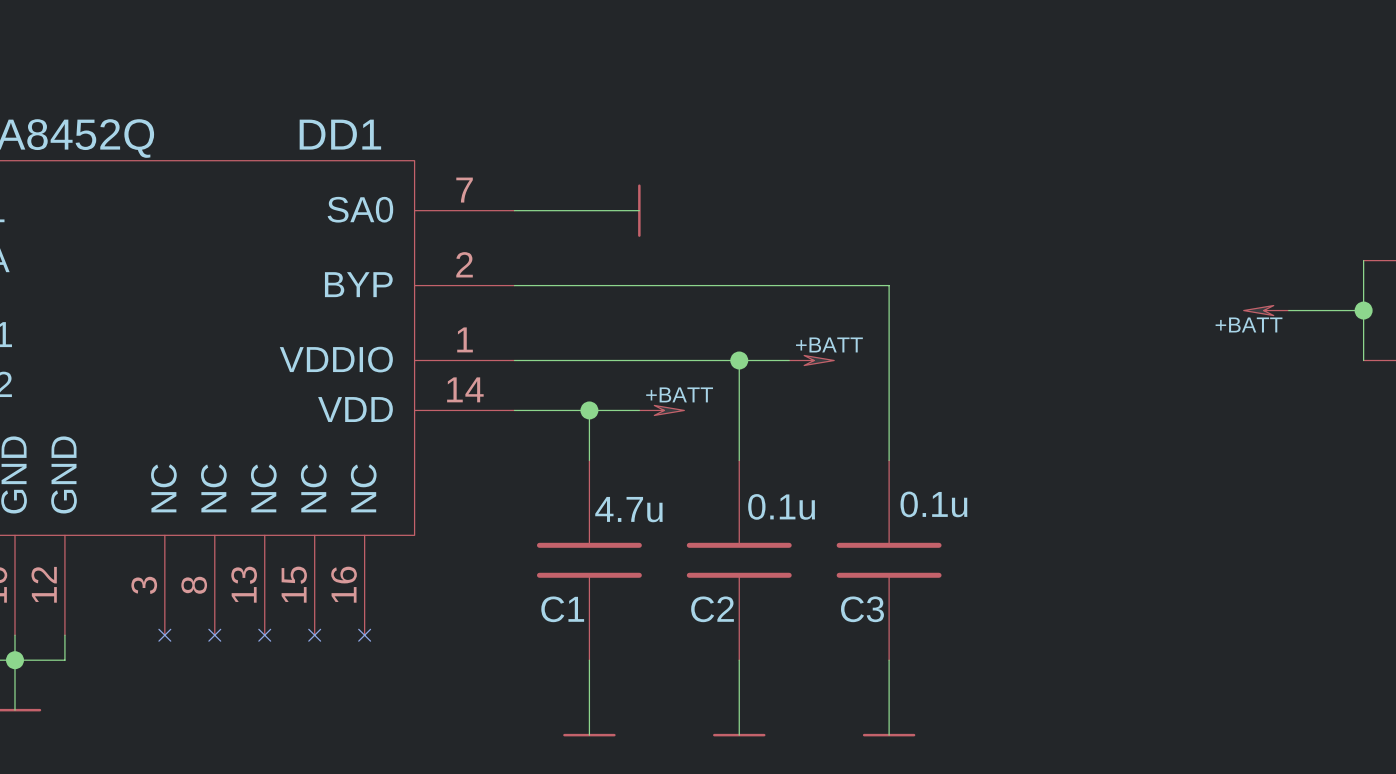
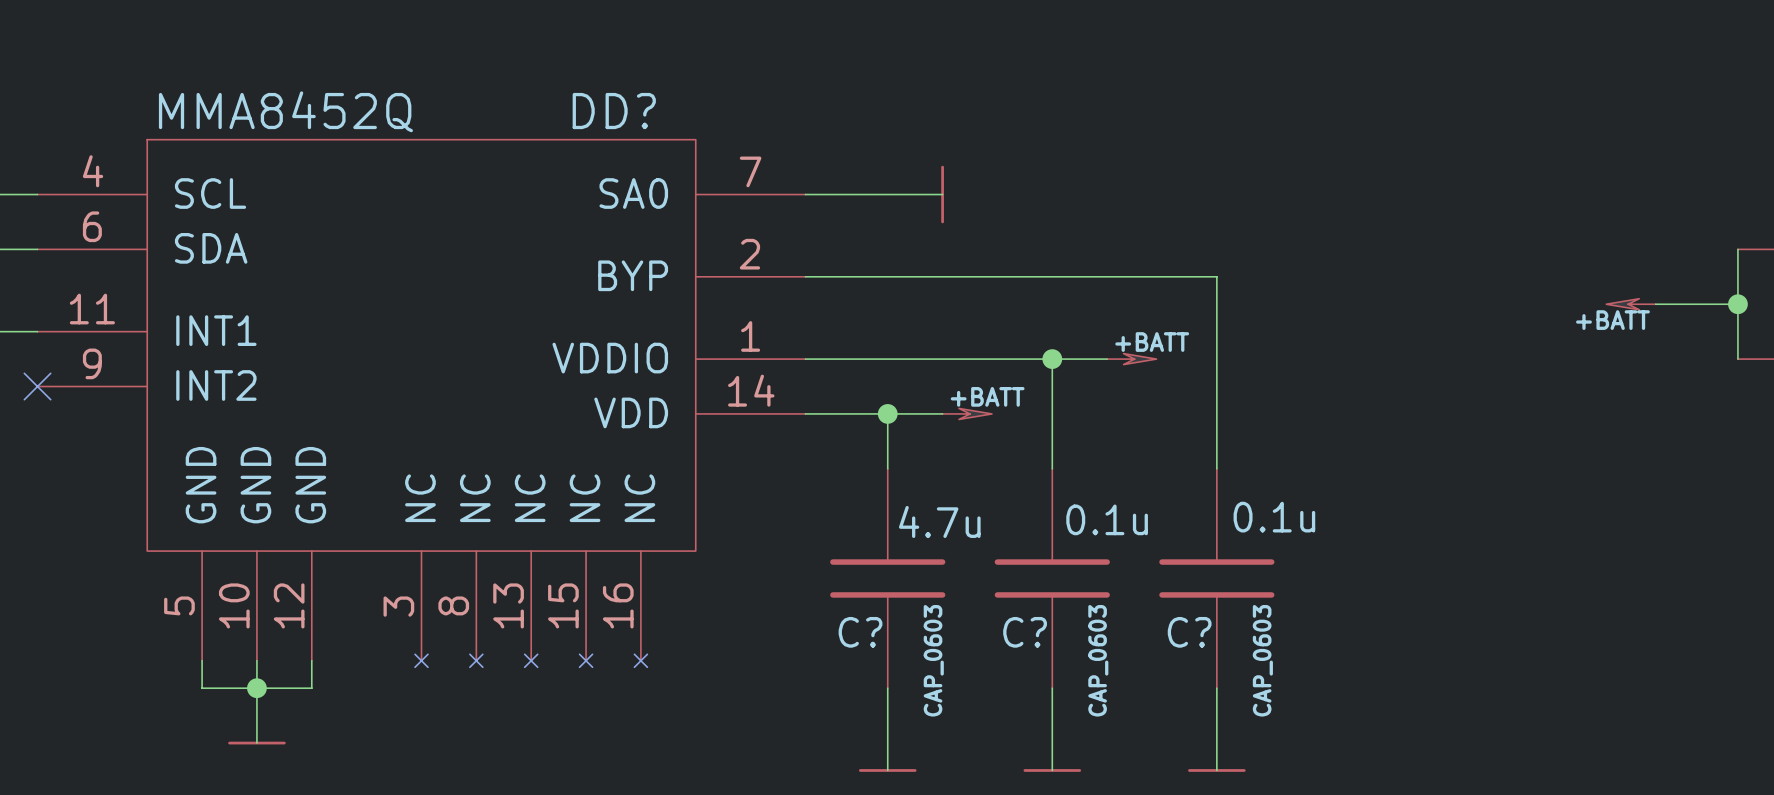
DD1 name: DD1 (340, 134) -> DD? (614, 111)
C1 name: C1 (562, 609) -> C? (860, 632)
C2 name: C2 (712, 609) -> C? (1025, 632)
C3 name: C3 (862, 609) -> C? (1189, 632)
C1 text: none -> CAP_0603 (933, 660)
C2 text: none -> CAP_0603 (1098, 660)
C3 text: none -> CAP_0603 (1262, 660)

